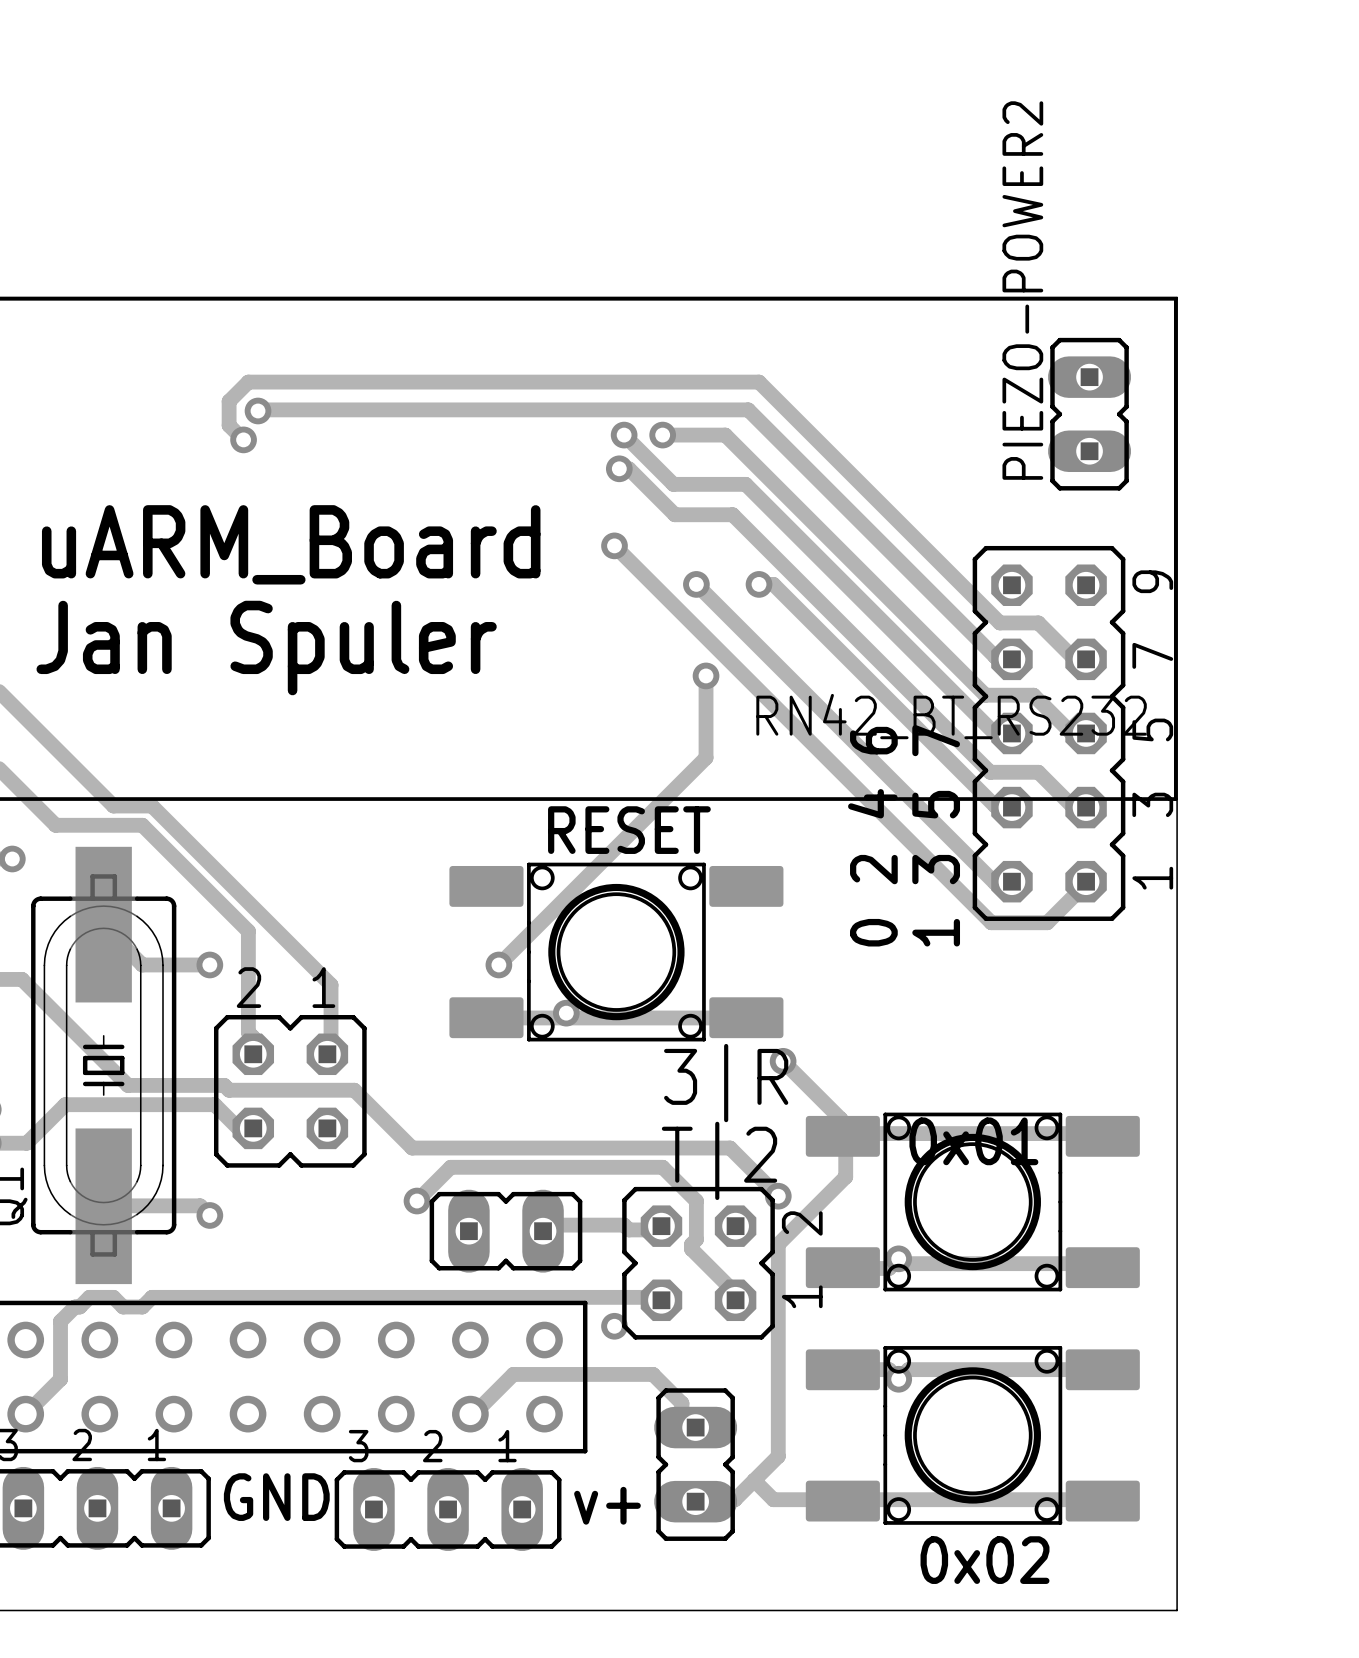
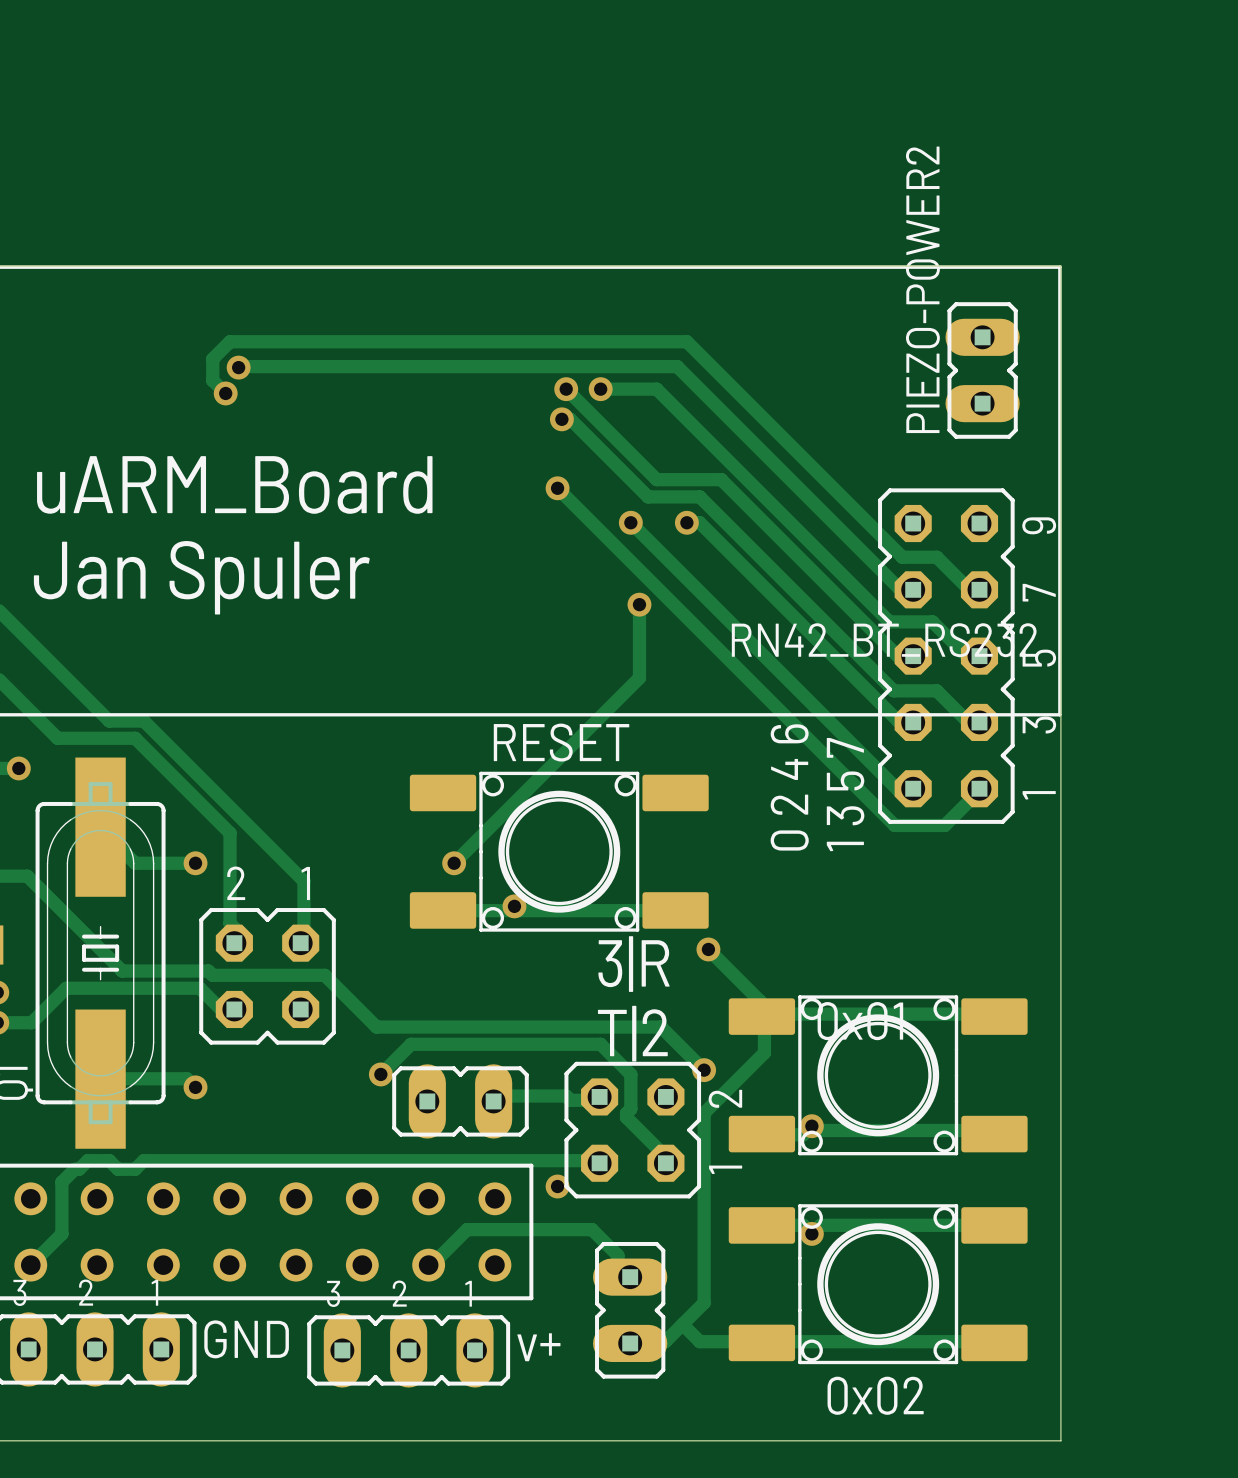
track: (673, 484) (745, 484) (797, 536) -> (610, 433) (656, 479) (721, 479)
track: (674, 514) (732, 514) (773, 555) -> (611, 460) (648, 496) (699, 496)

